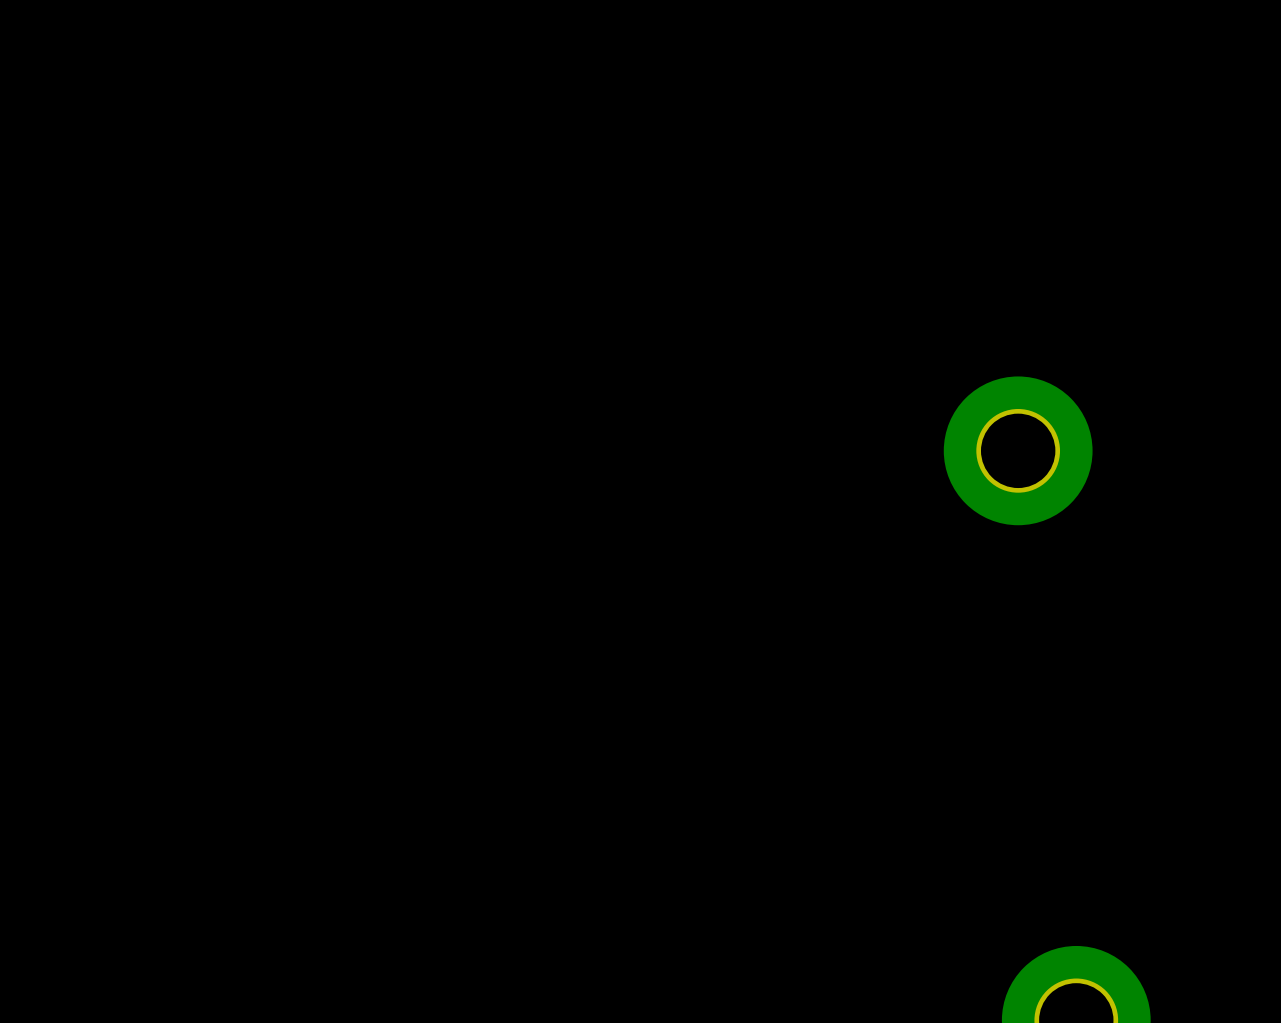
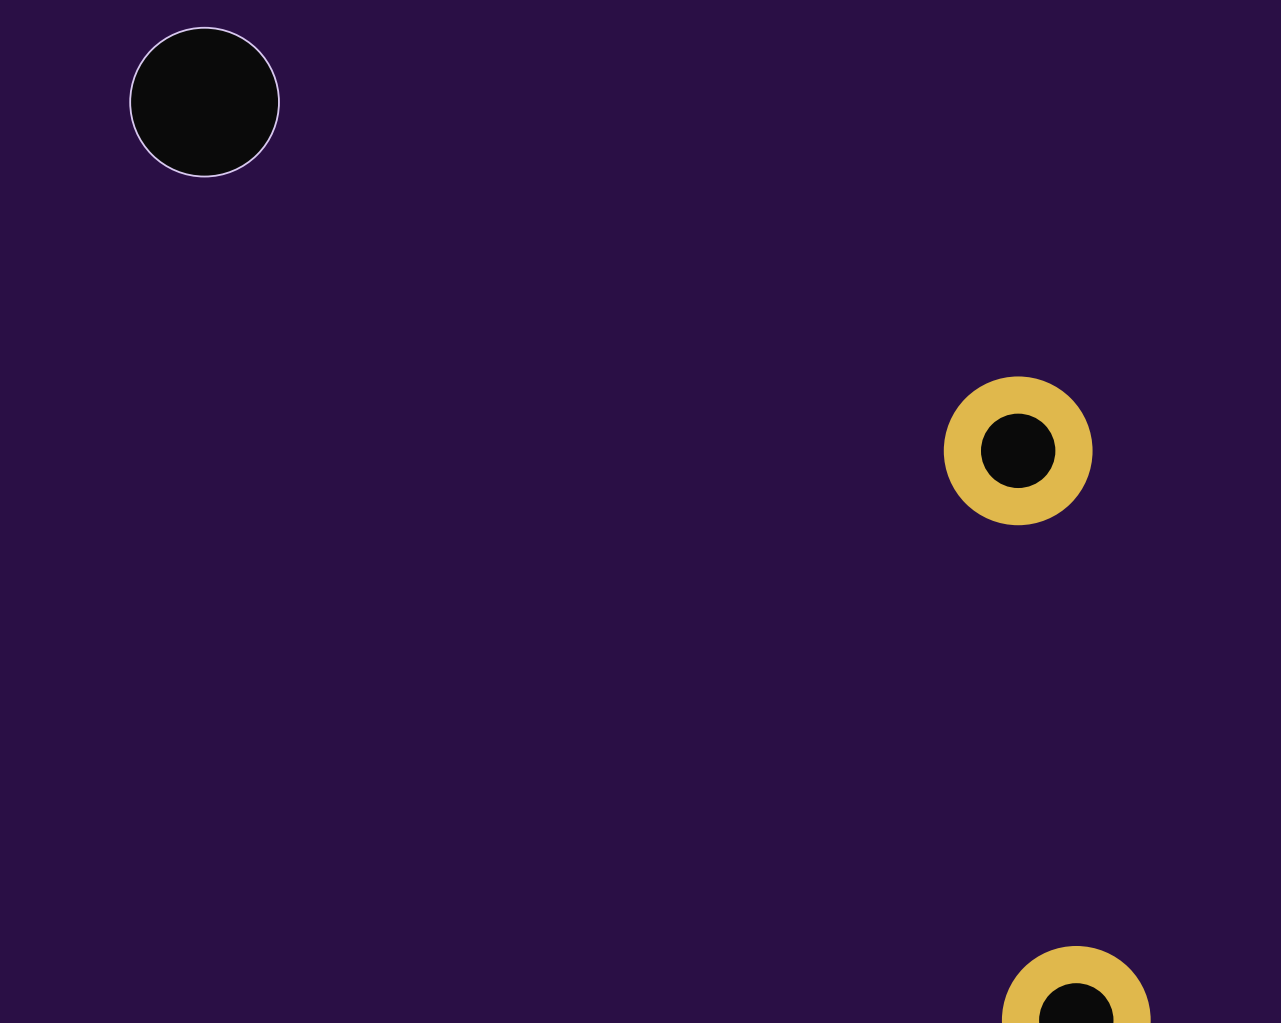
part: none -> (204, 102)

